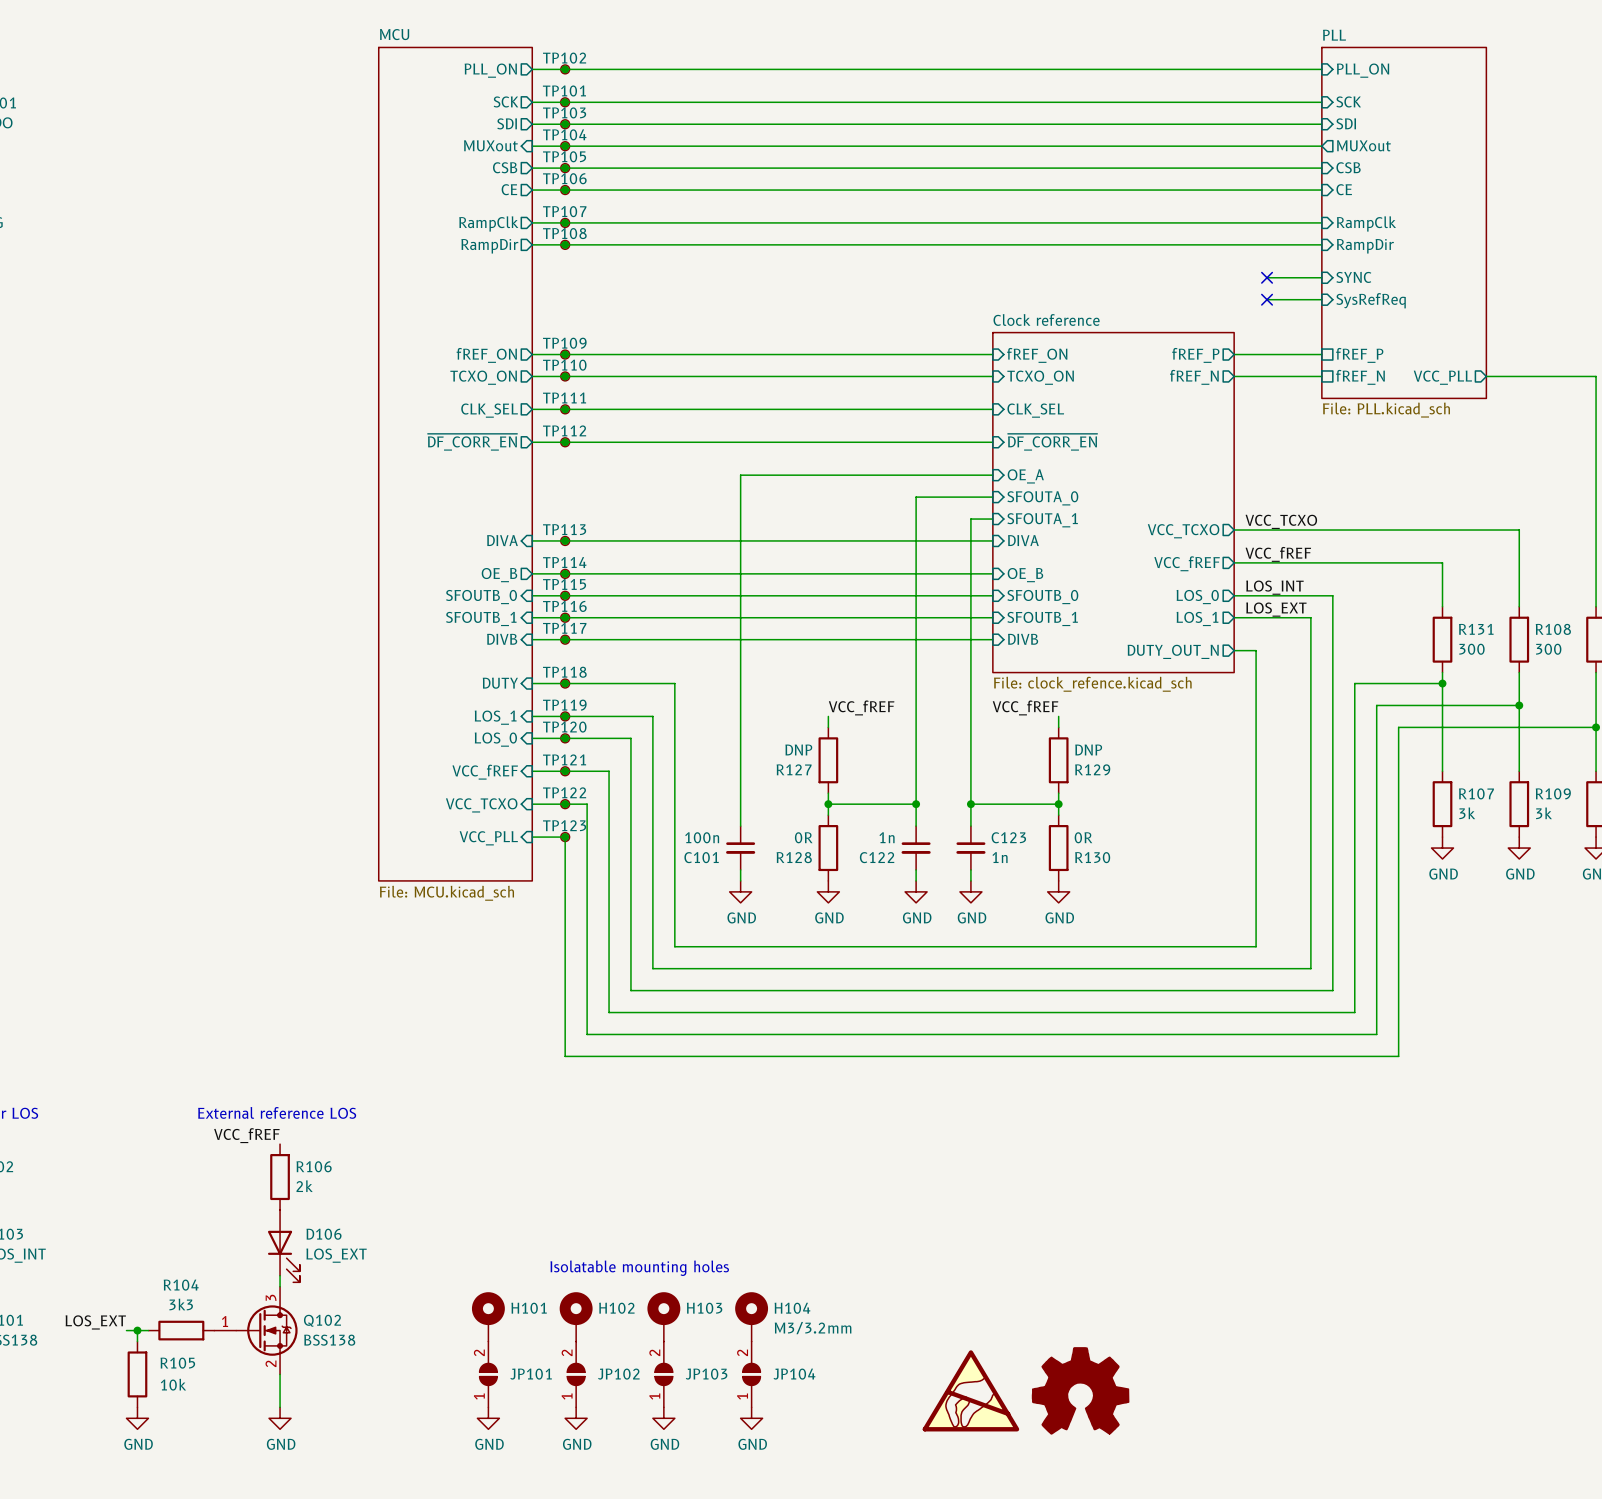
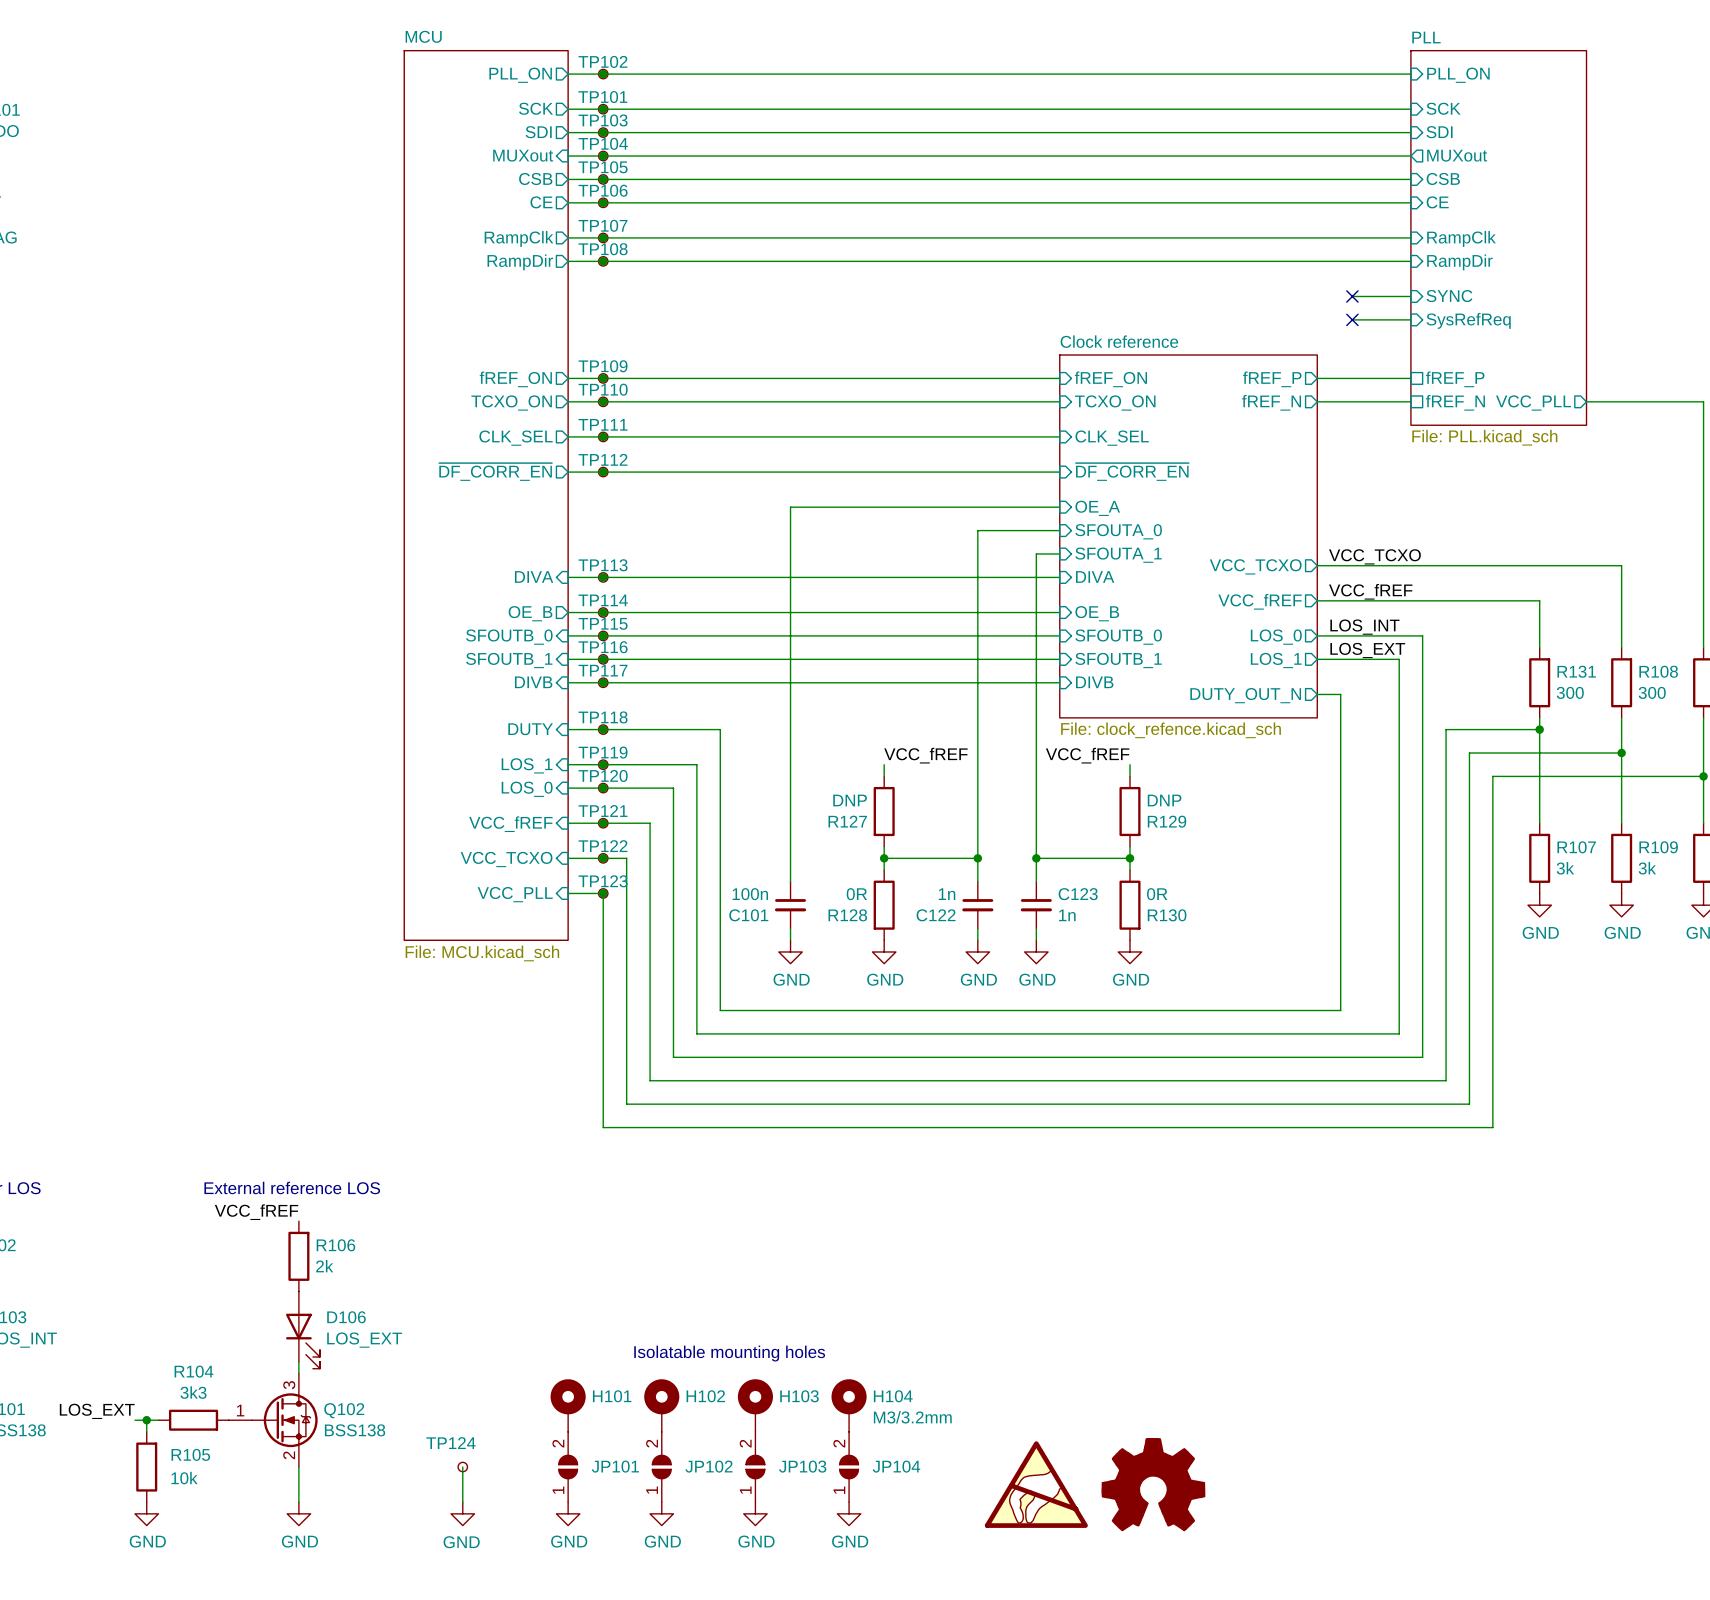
text position: Isolatable mounting holes (639, 1268) -> Isolatable mounting holes (729, 1353)
H101 position: (488, 1316) -> (568, 1405)
H102 position: (576, 1316) -> (661, 1405)
H103 position: (663, 1316) -> (755, 1405)
H104 position: (751, 1316) -> (849, 1405)
wire: none -> (462, 1467) (462, 1502)
TP124: none -> (462, 1467)
JP101 position: (488, 1374) -> (568, 1467)
JP102 position: (576, 1374) -> (661, 1467)
JP103 position: (663, 1374) -> (755, 1467)
JP104 position: (751, 1374) -> (849, 1467)
power symbol: none -> GND (462, 1513)
power symbol: GND (488, 1418) -> none
power symbol: none -> GND (568, 1513)
power symbol: GND (576, 1418) -> none
power symbol: none -> GND (661, 1513)
power symbol: GND (663, 1418) -> none
power symbol: none -> GND (755, 1513)
power symbol: GND (751, 1418) -> none
power symbol: none -> GND (849, 1513)

